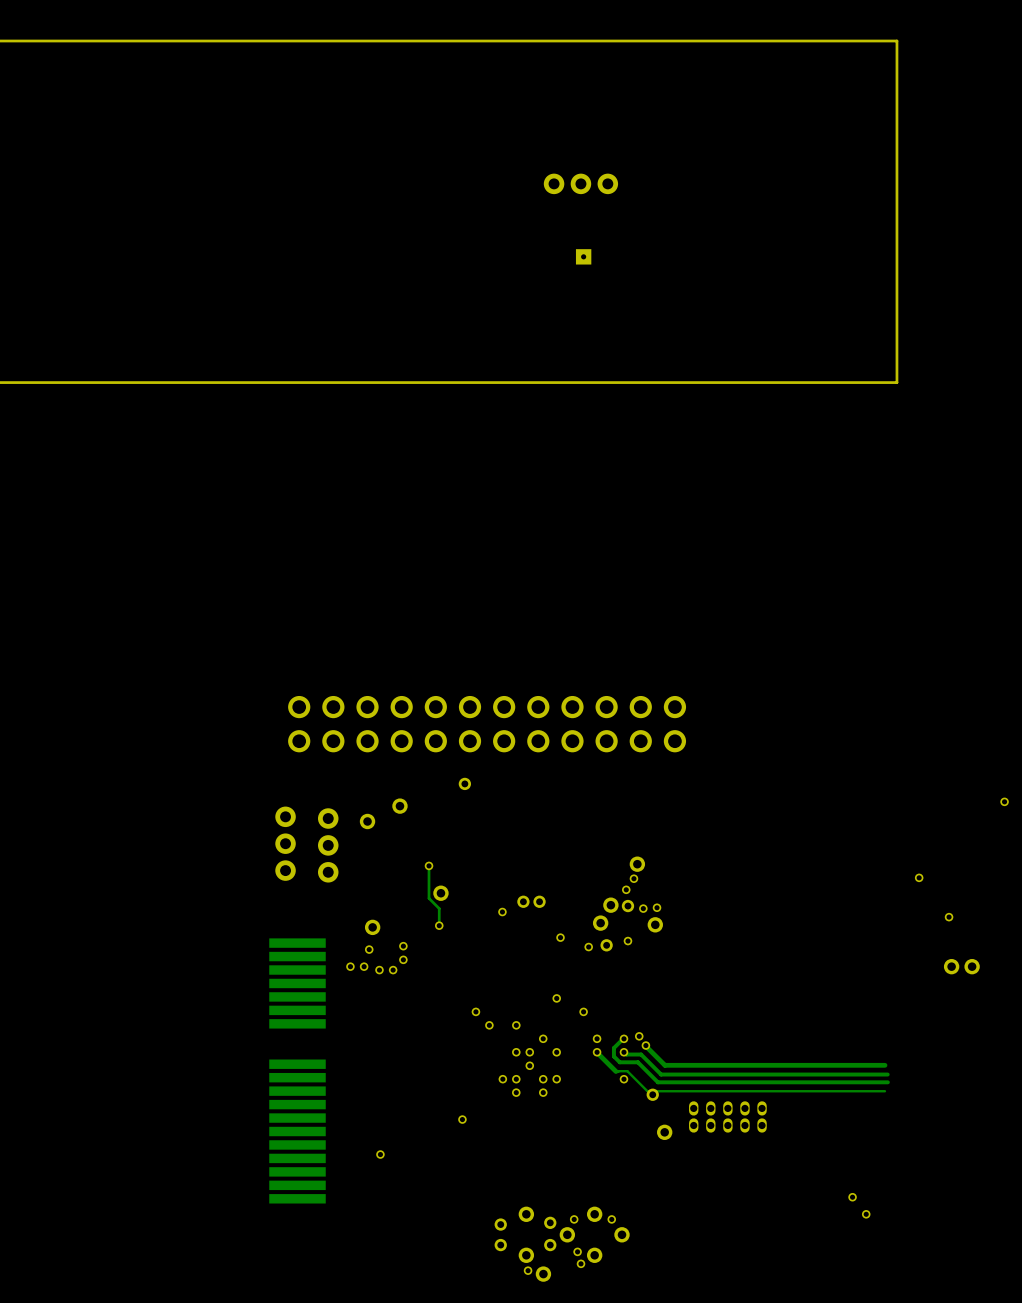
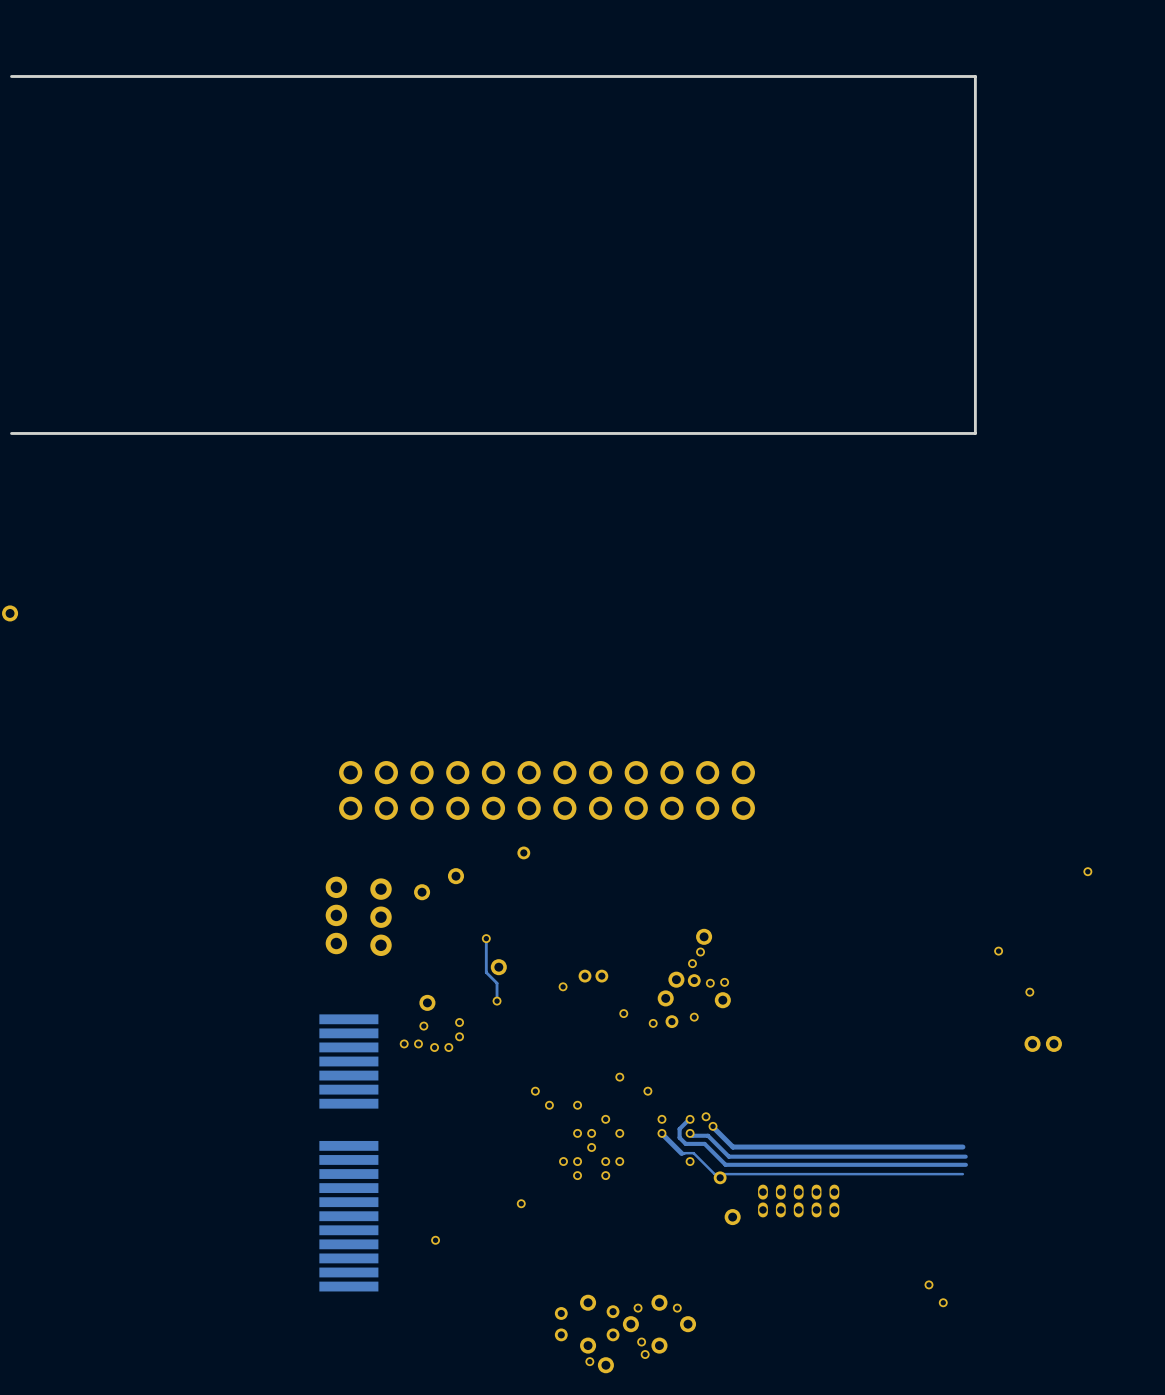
part: (580, 183) -> none
part: (583, 256) -> none

